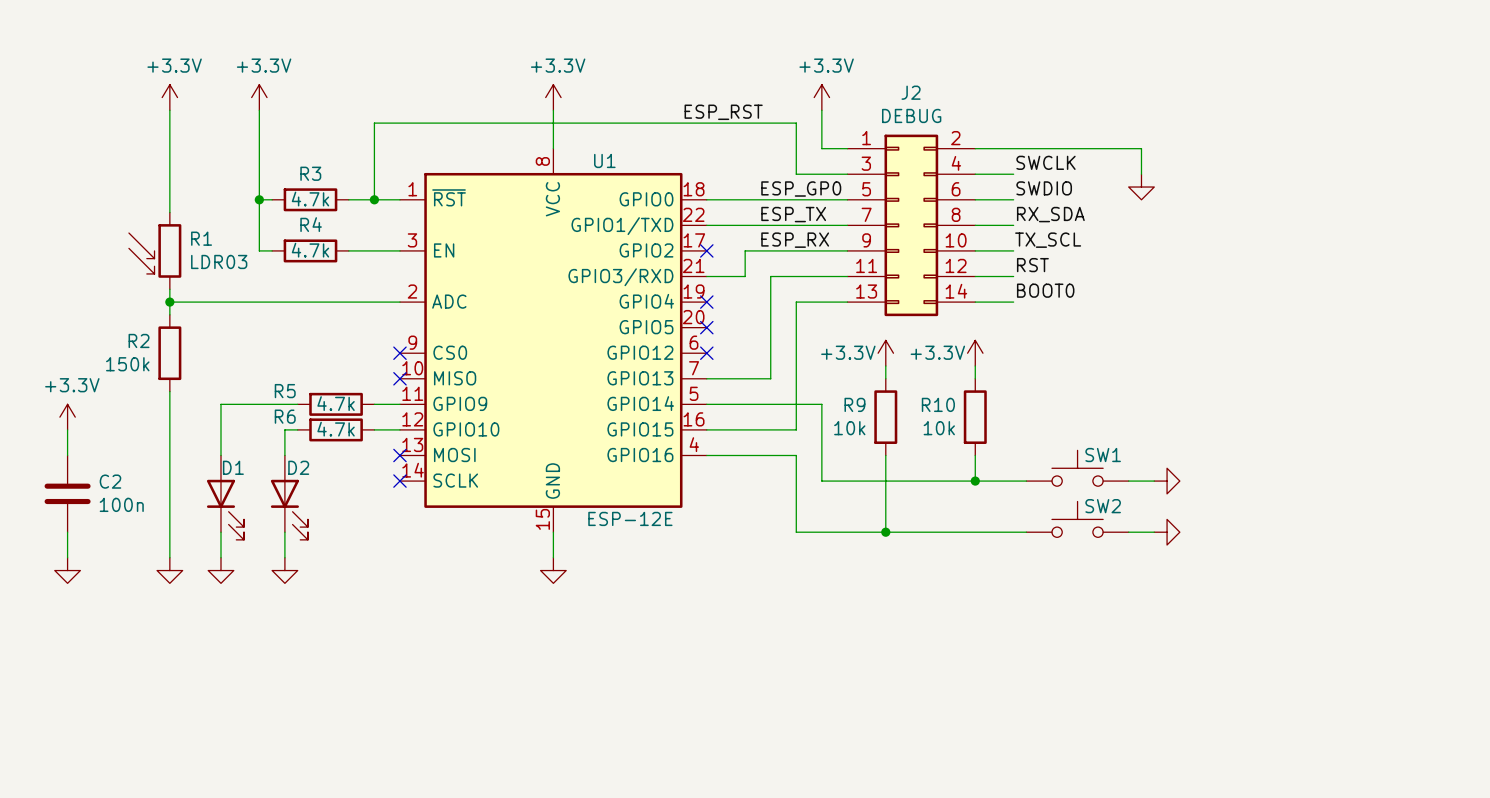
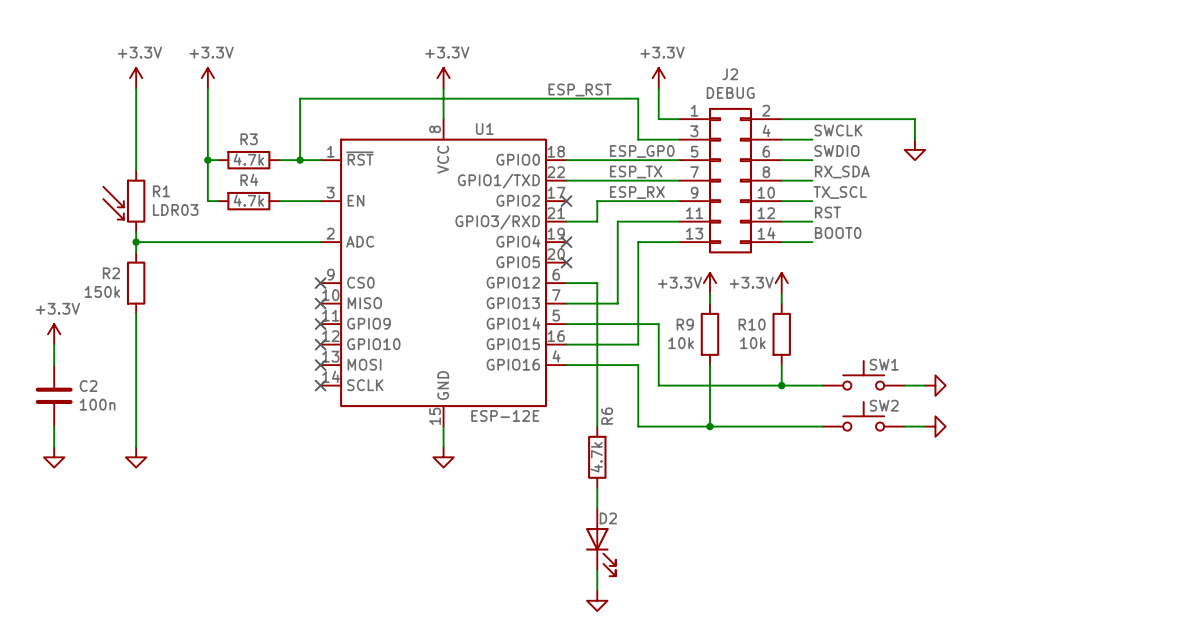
wire: none -> (566, 283) (597, 283) (597, 426)
no-connect mark: (706, 353) -> none
wire: (297, 404) (220, 404) (220, 455) -> none
R5: 4.7k (336, 404) -> none
wire: (374, 404) (399, 404) -> none
no-connect mark: none -> (320, 324)
wire: (297, 429) (284, 429) (284, 455) -> none
R6 rotation: 0° (336, 429) -> 90° clockwise (597, 457)
R6 position: (336, 429) -> (597, 457)
wire: (374, 429) (399, 429) -> none
no-connect mark: none -> (320, 344)
D1: (225, 497) -> none
D2 position: (289, 497) -> (600, 542)
wire: (220, 532) (220, 557) -> none
wire: (284, 532) (284, 557) -> none
power symbol: (220, 570) -> none
power symbol: (284, 570) -> none
wire: none -> (597, 488) (597, 508)
wire: none -> (597, 570) (597, 590)
power symbol: none -> (597, 600)

